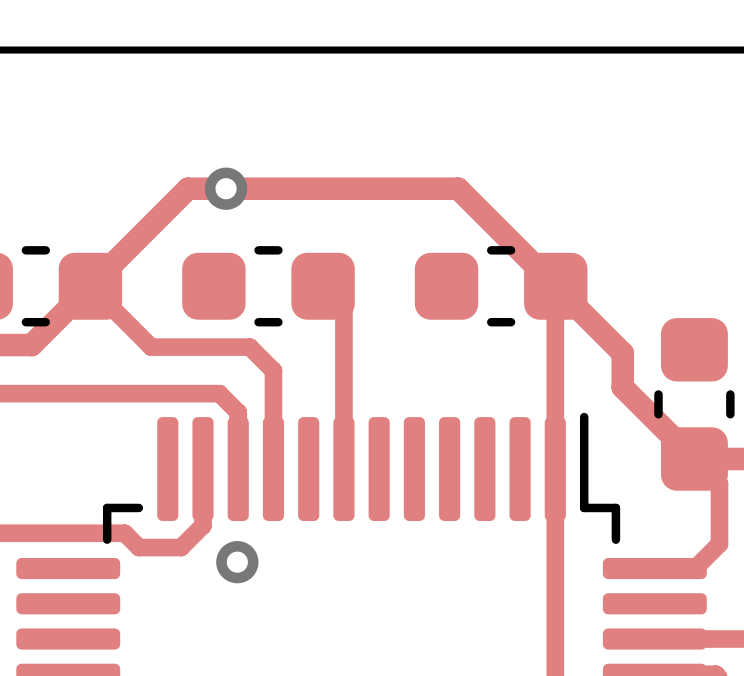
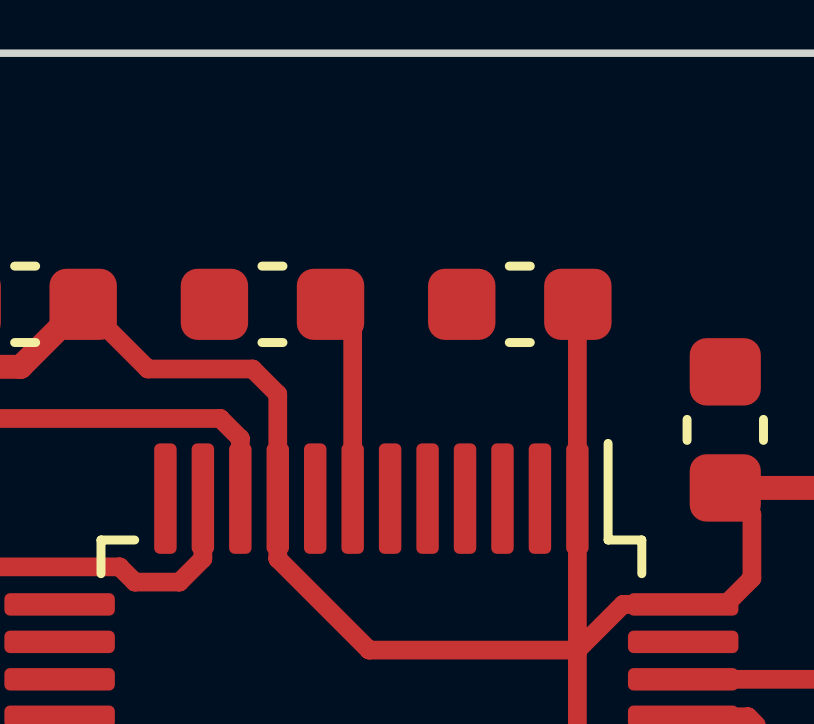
via: (226, 188) -> none
track: (90, 286) (187, 188) (458, 188) (622, 353) (622, 387) (694, 458) -> none
track: none -> (277, 498) (277, 558) (369, 650) (577, 650) (623, 604) (683, 604)
via: (237, 562) -> none

